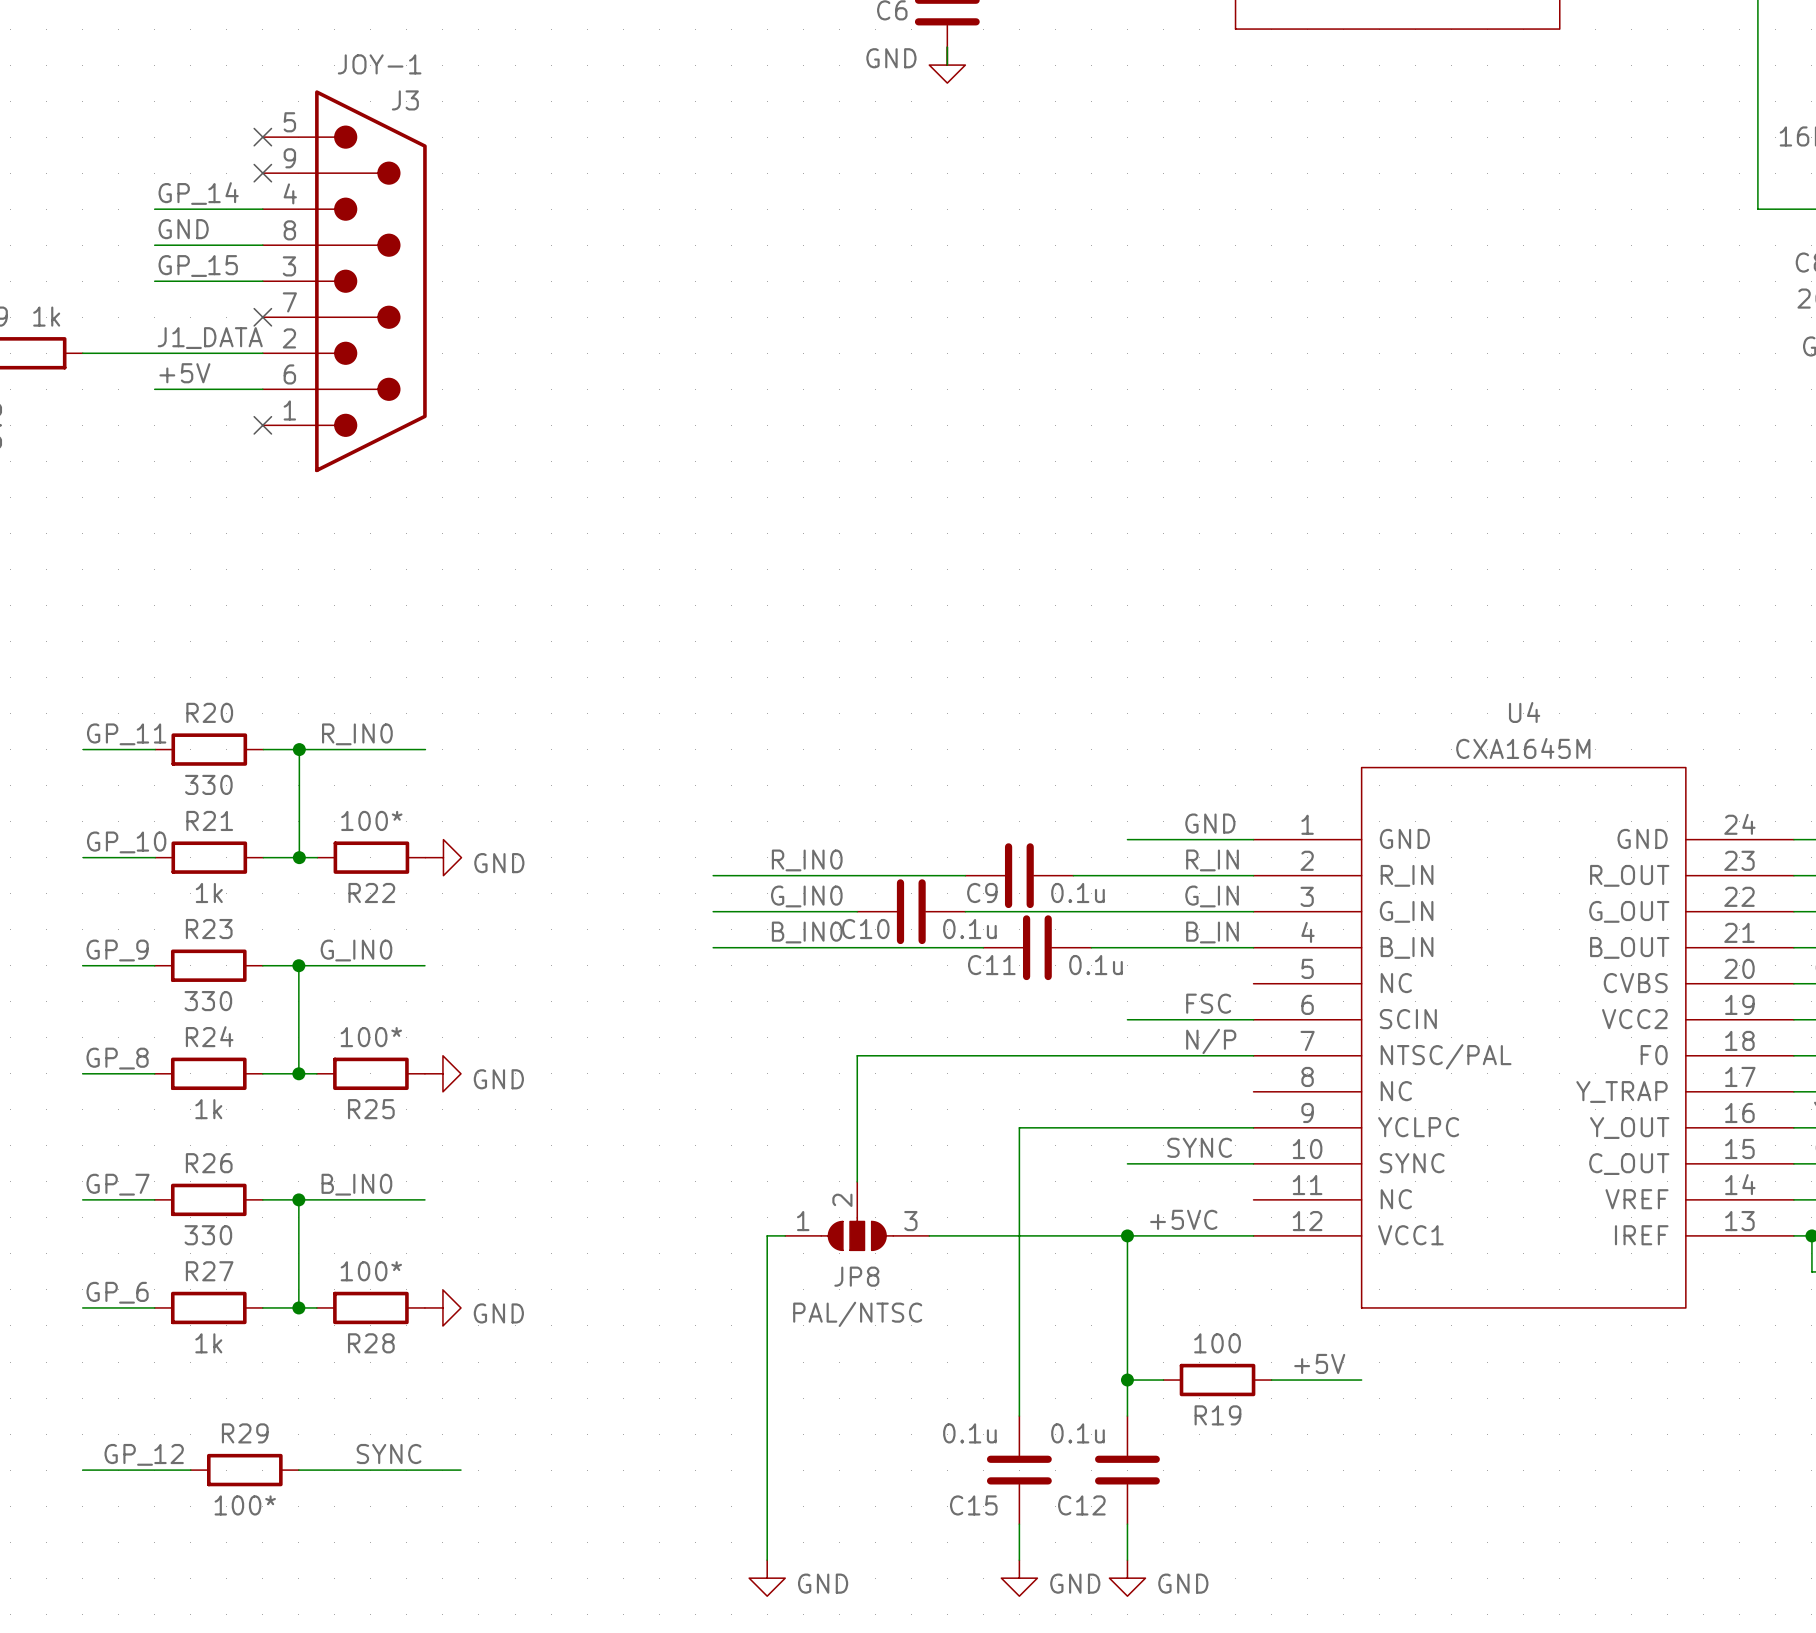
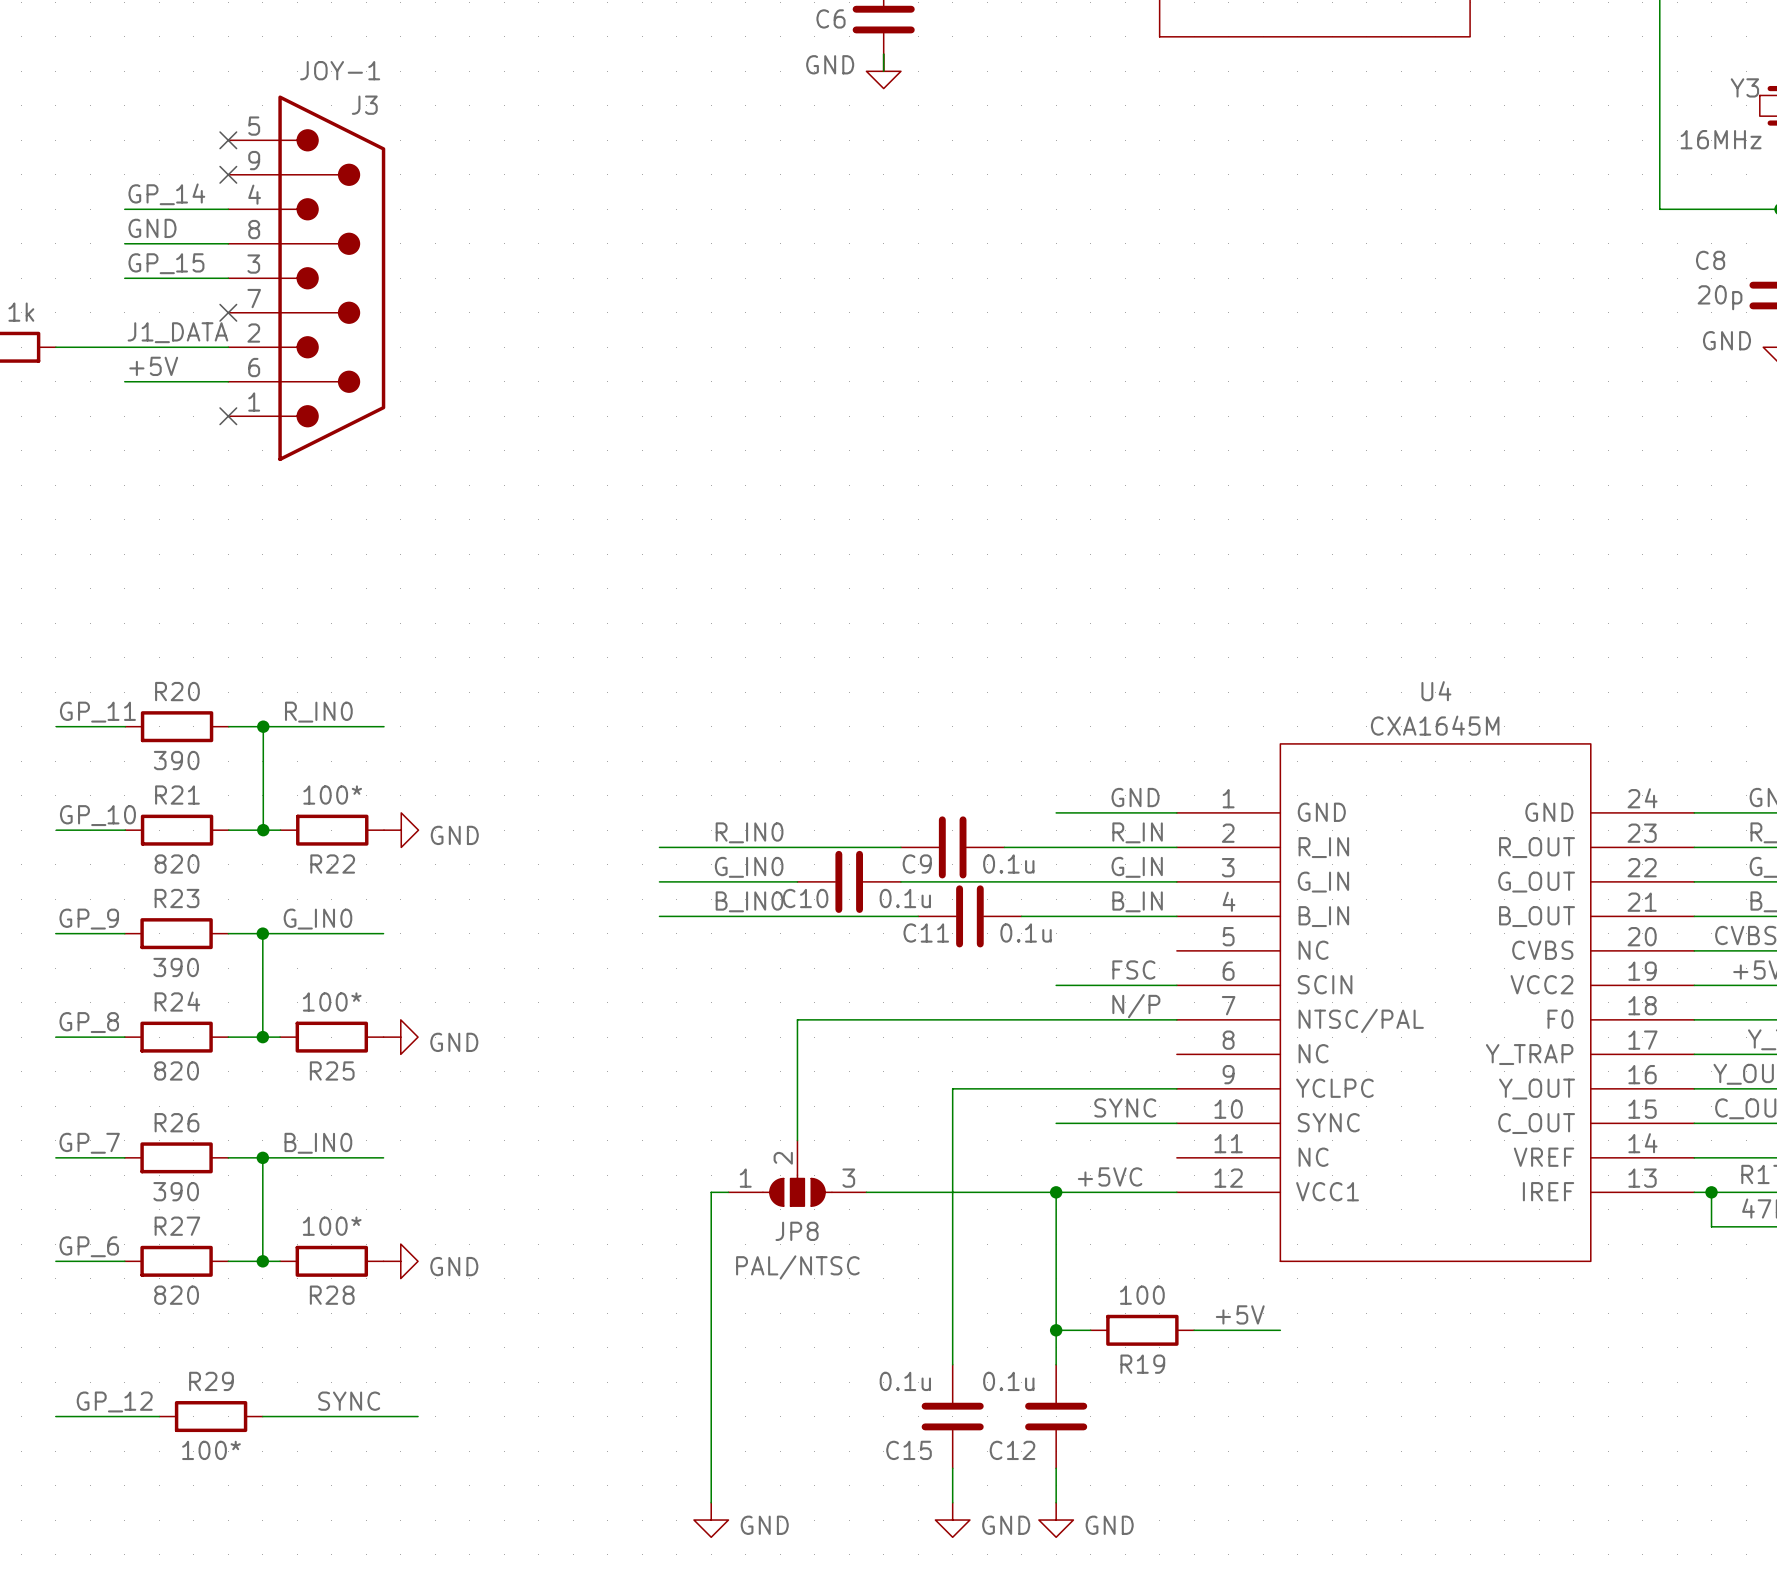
R20 value: 330 (208, 784) -> 390 (176, 760)
R21 value: 1k (209, 893) -> 820 (177, 864)
R23 value: 330 (208, 1001) -> 390 (176, 967)
R24 value: 1k (208, 1109) -> 820 (176, 1070)
R26 value: 330 (208, 1235) -> 390 (176, 1191)
R27 value: 1k (208, 1343) -> 820 (176, 1295)

